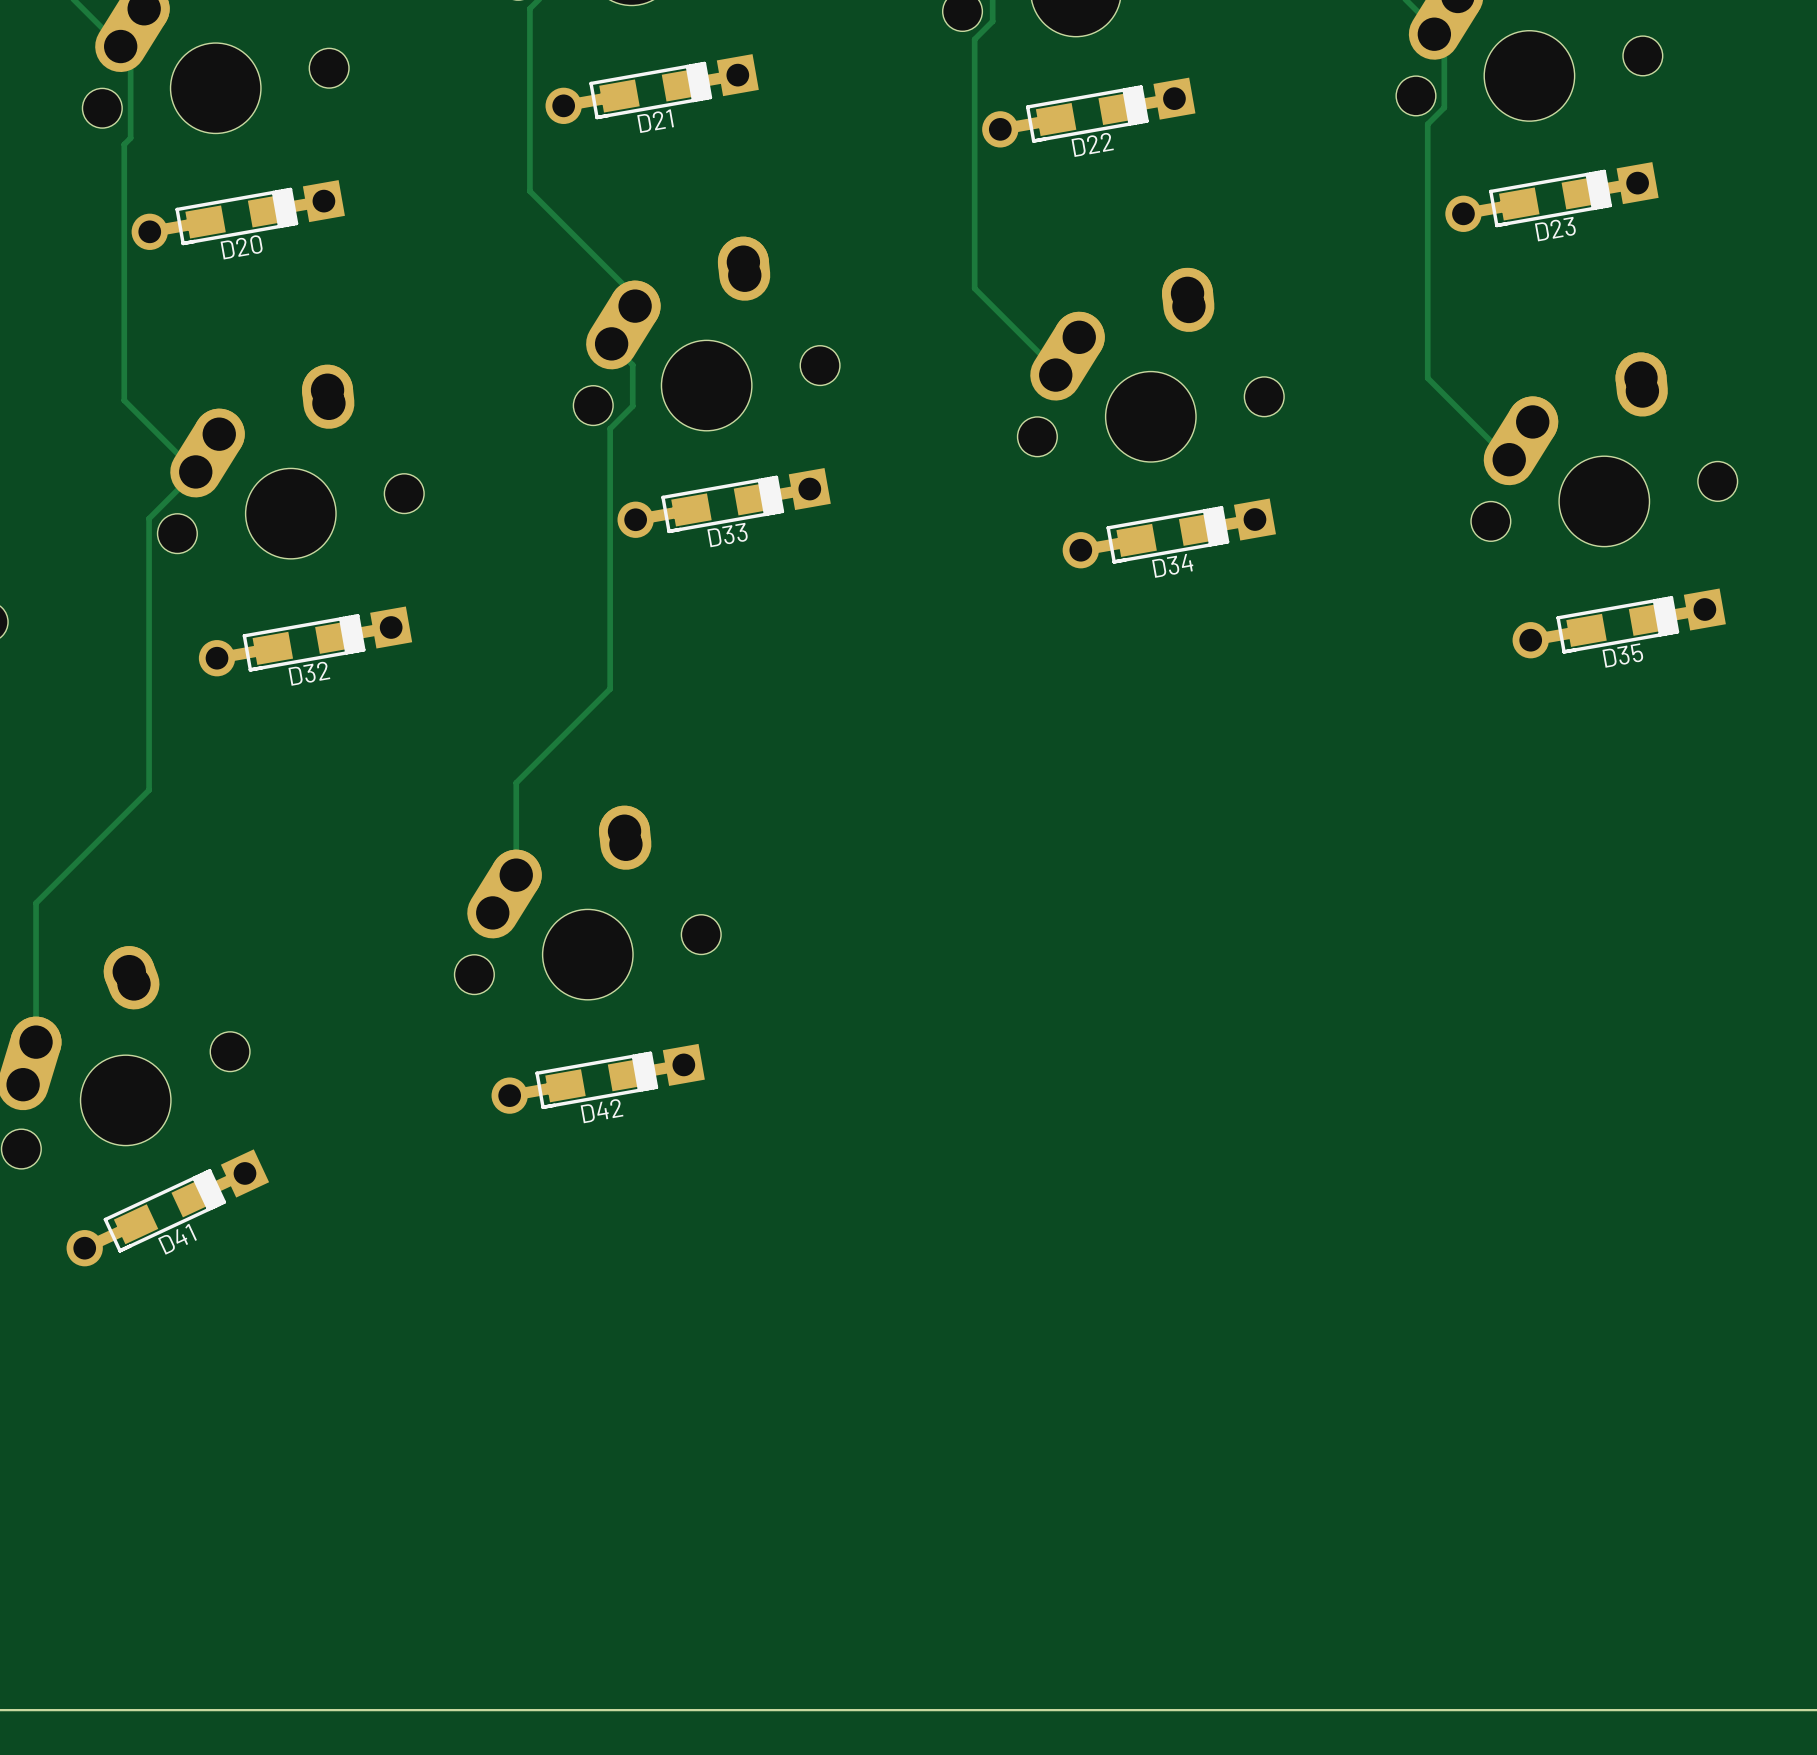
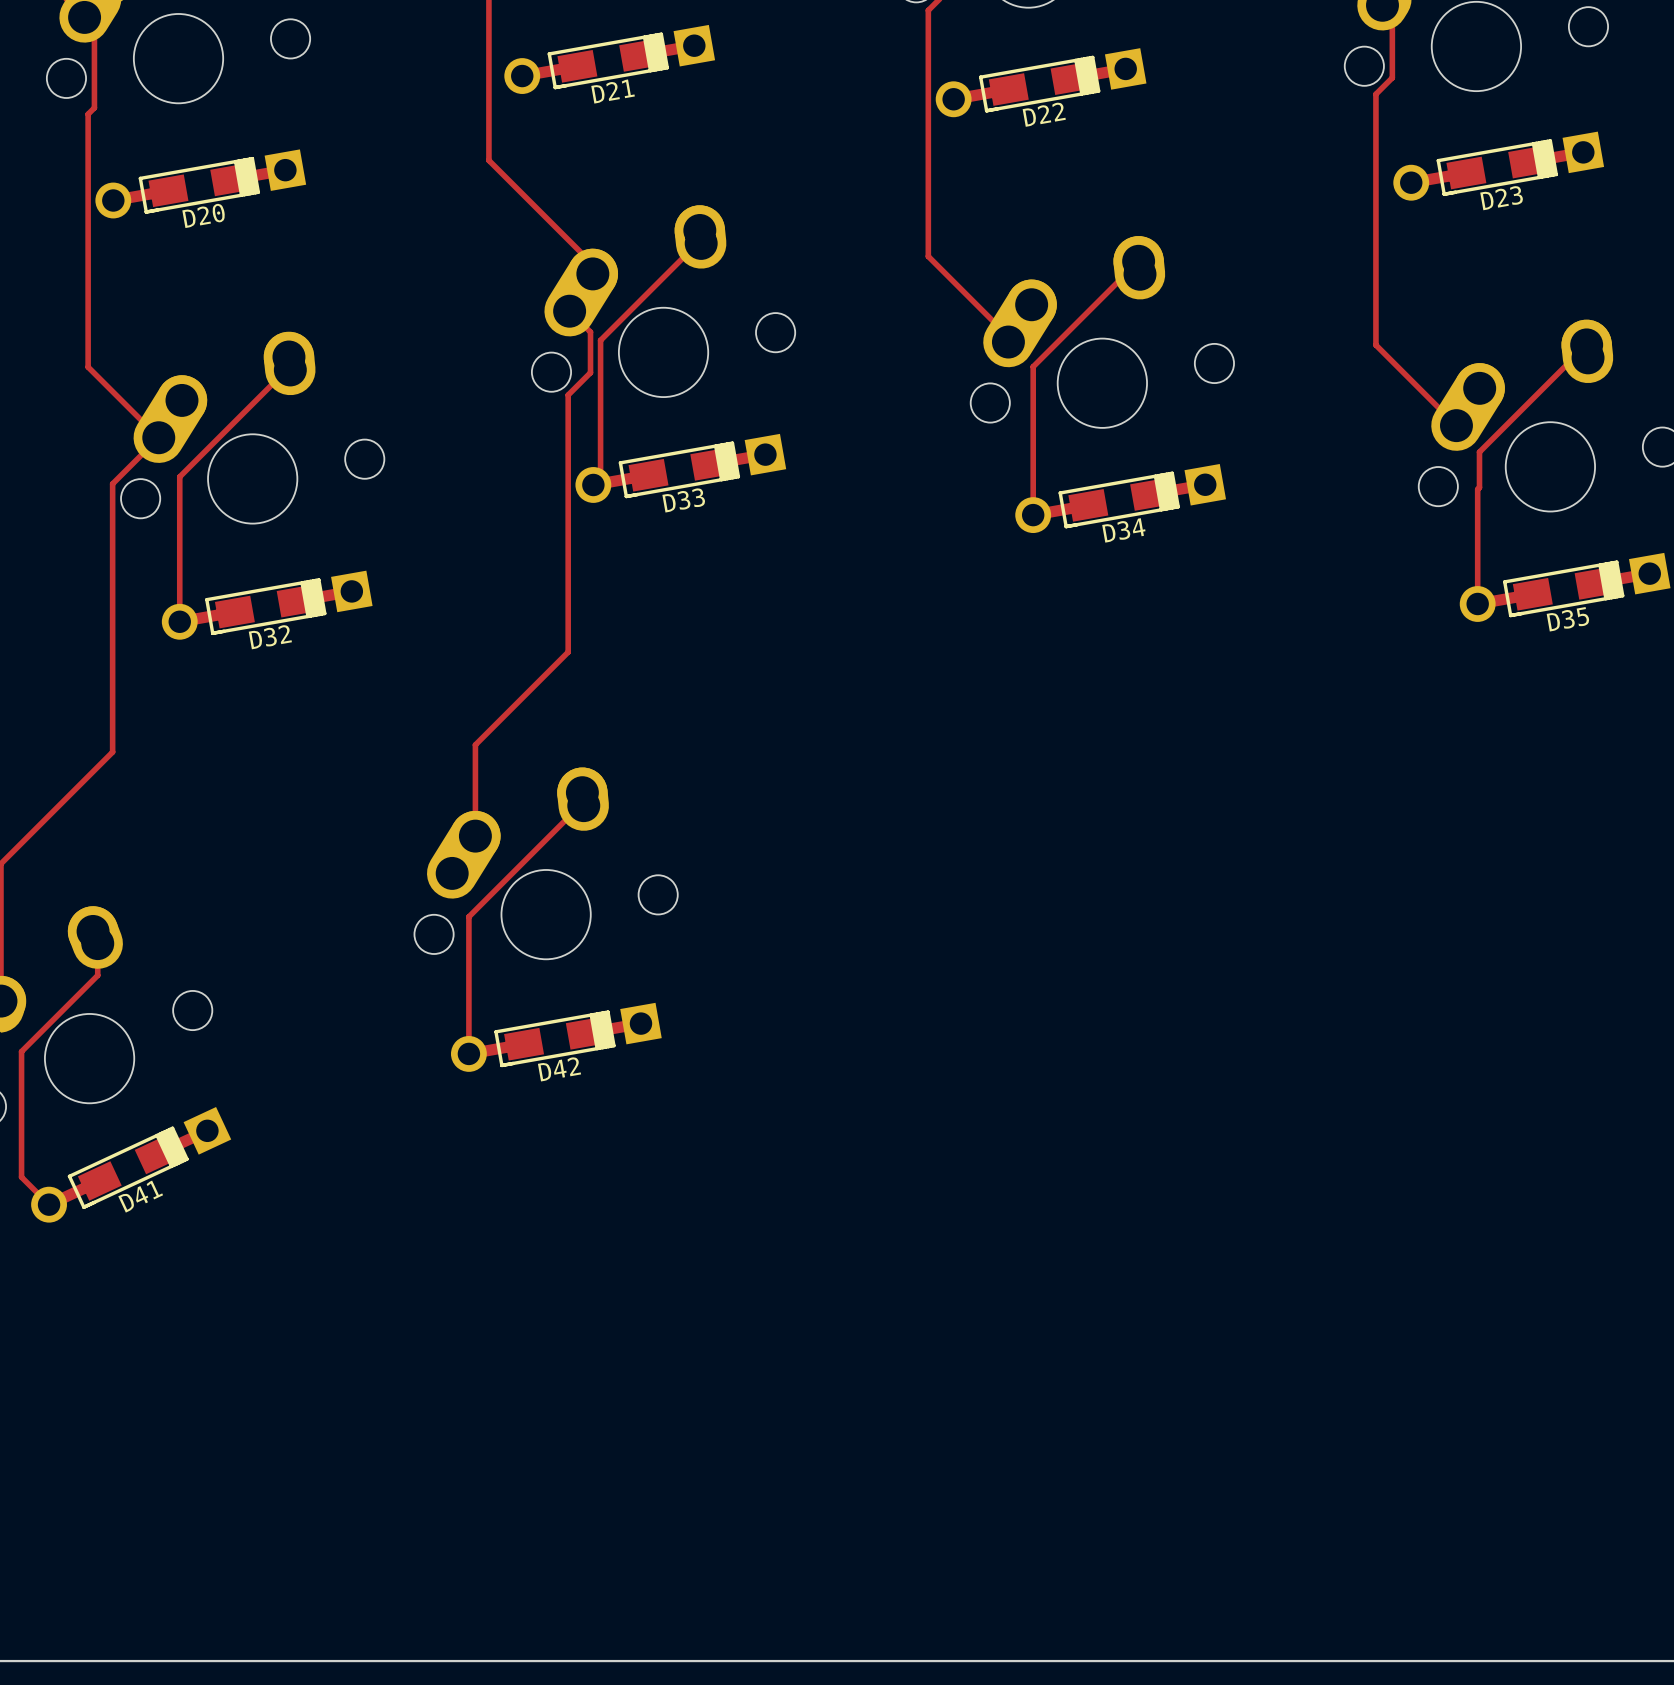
track: none -> (701, 243) (697, 243) (600, 340) (600, 477) (593, 484)
track: none -> (1138, 261) (1033, 366) (1033, 515)
track: none -> (1586, 344) (1479, 452) (1477, 603)
track: none -> (290, 369) (286, 369) (179, 476) (179, 621)
track: none -> (583, 805) (580, 805) (468, 916) (468, 1053)
track: none -> (97, 943) (97, 975) (21, 1051) (21, 1177) (49, 1204)

